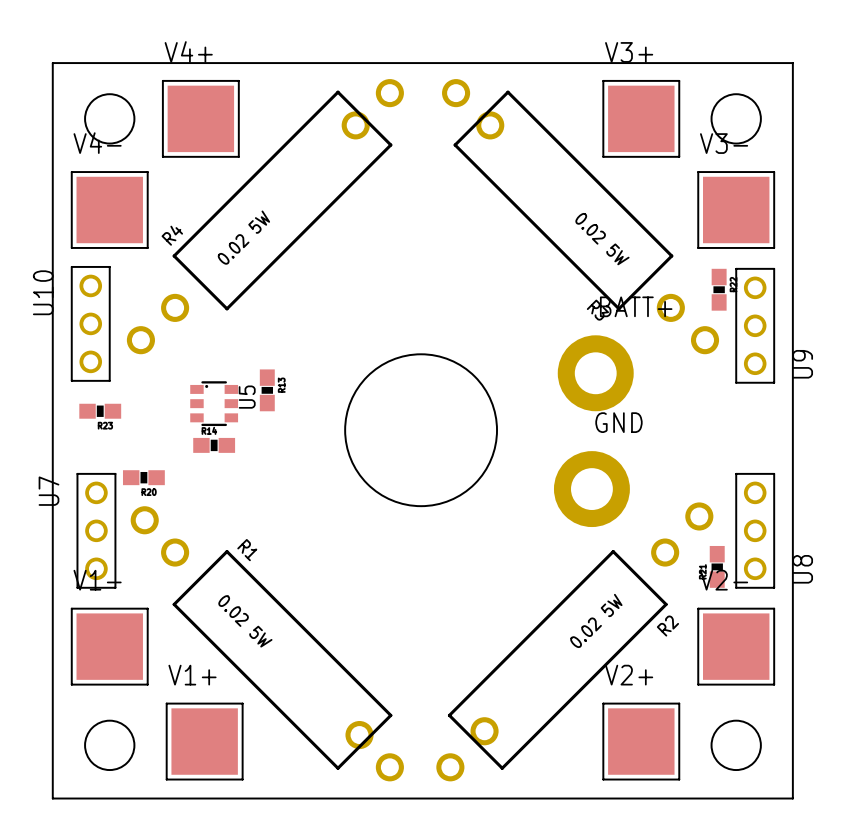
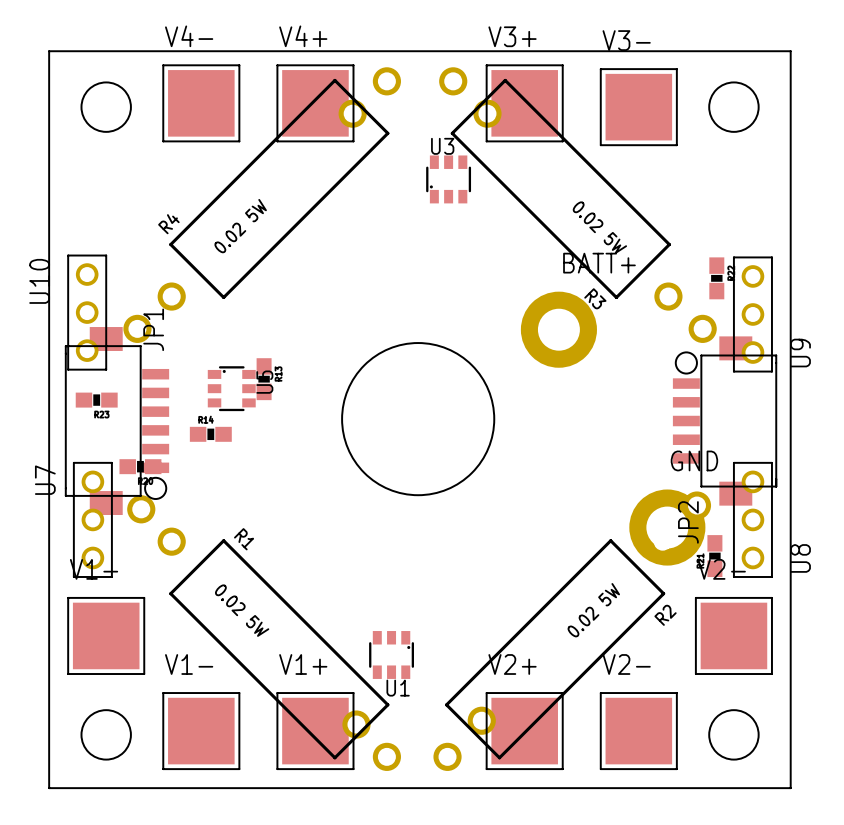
V3+ name: V3+ (629, 52) -> V3- (626, 40)
V3+: none -> (524, 103)
V4+ position: (200, 118) -> (315, 103)
U3: none -> (448, 179)
V4- position: (109, 210) -> (201, 103)
V3-: (736, 210) -> none
BATT+ position: (595, 373) -> (558, 329)
U5 position: (214, 403) -> (231, 388)
JP1: none -> (117, 421)
JP2: none -> (725, 421)
GND position: (591, 489) -> (667, 527)
U1: none -> (391, 654)
V1+ name: V1+ (192, 675) -> V1- (189, 664)
V2+ name: V2+ (629, 675) -> V2- (626, 664)
V1+: none -> (315, 731)
V2+: none -> (524, 731)

